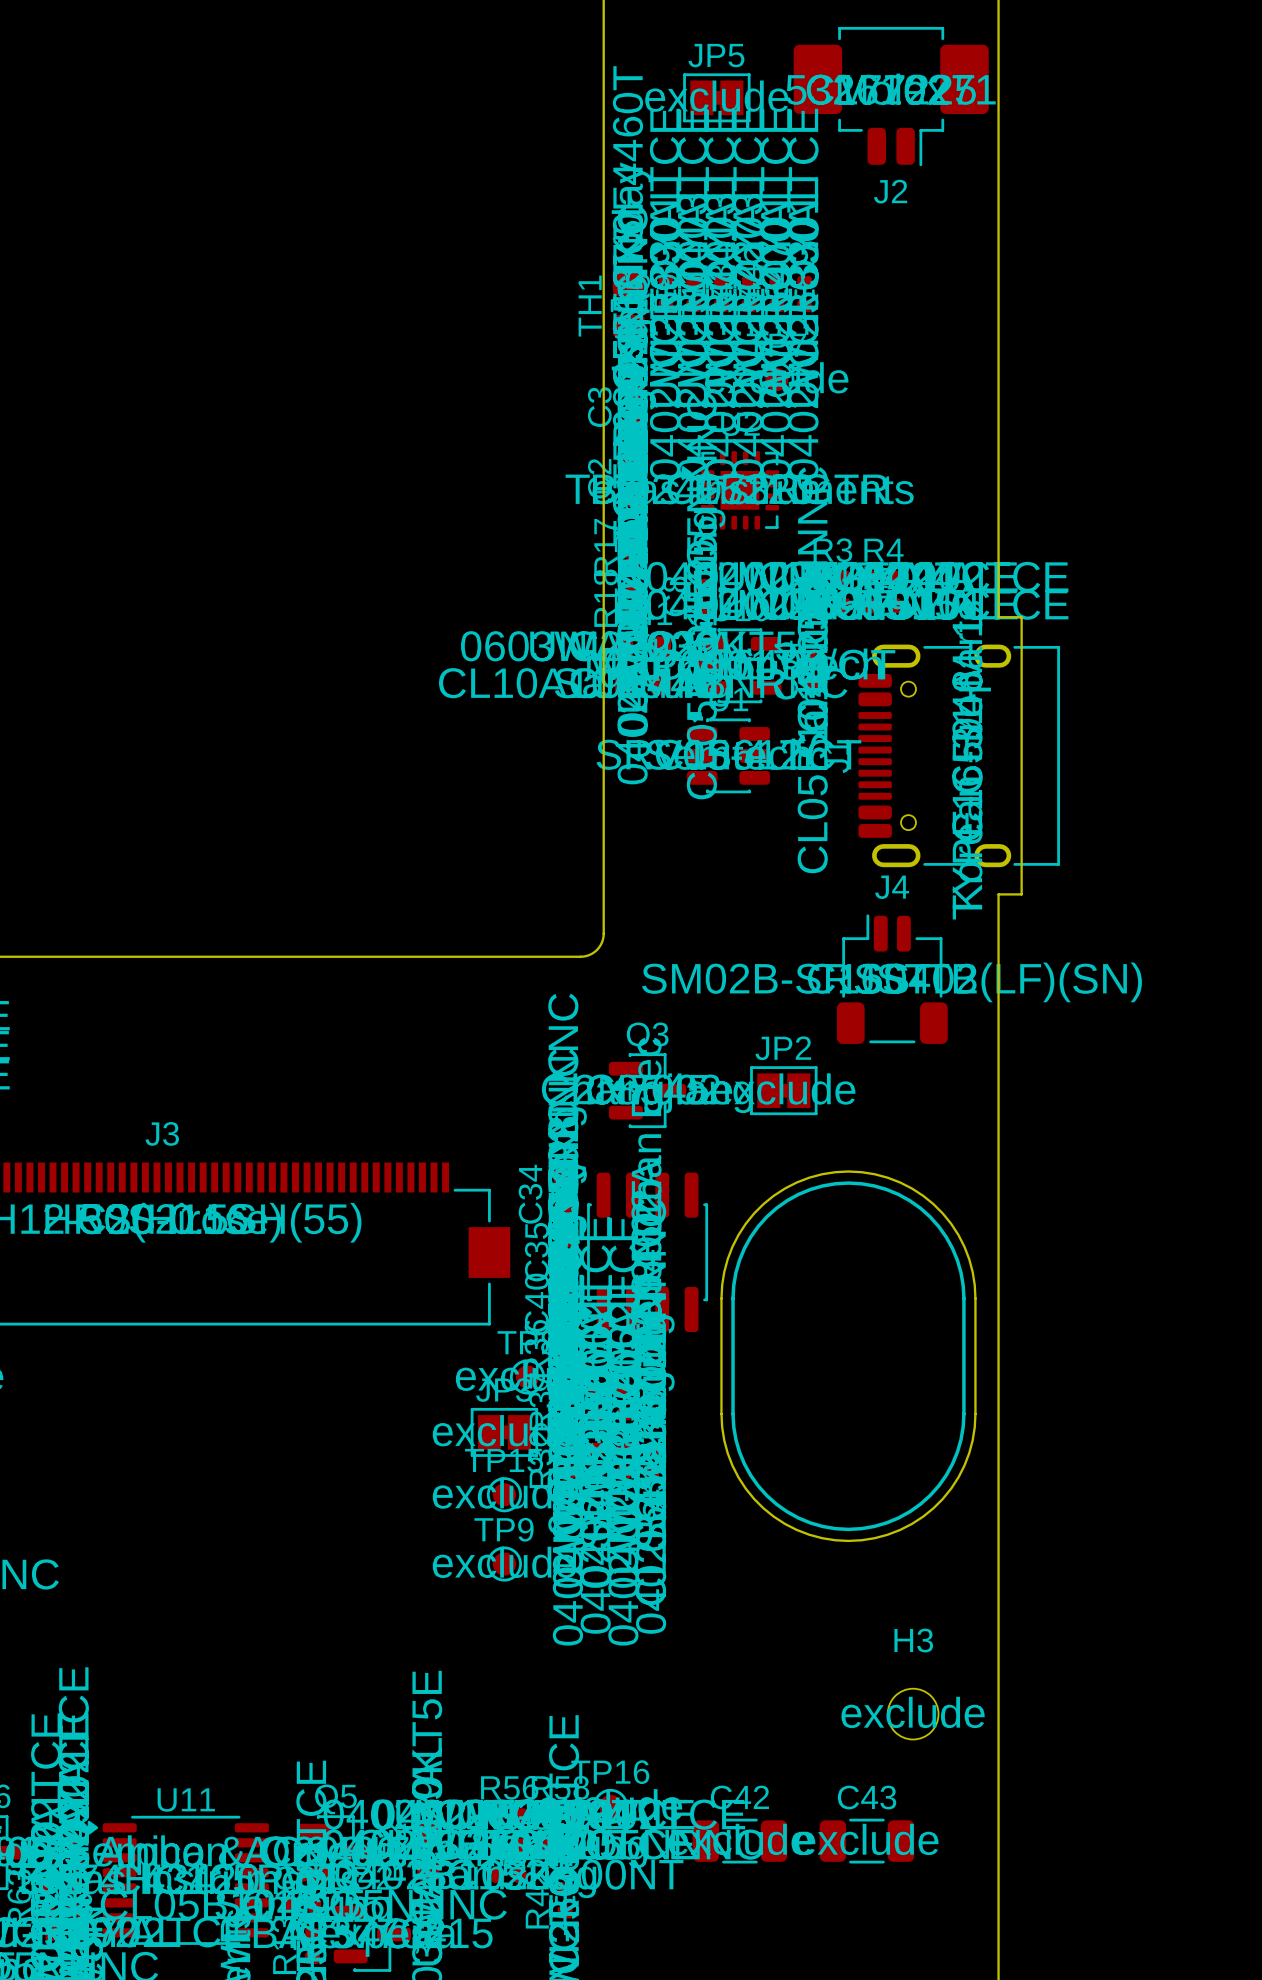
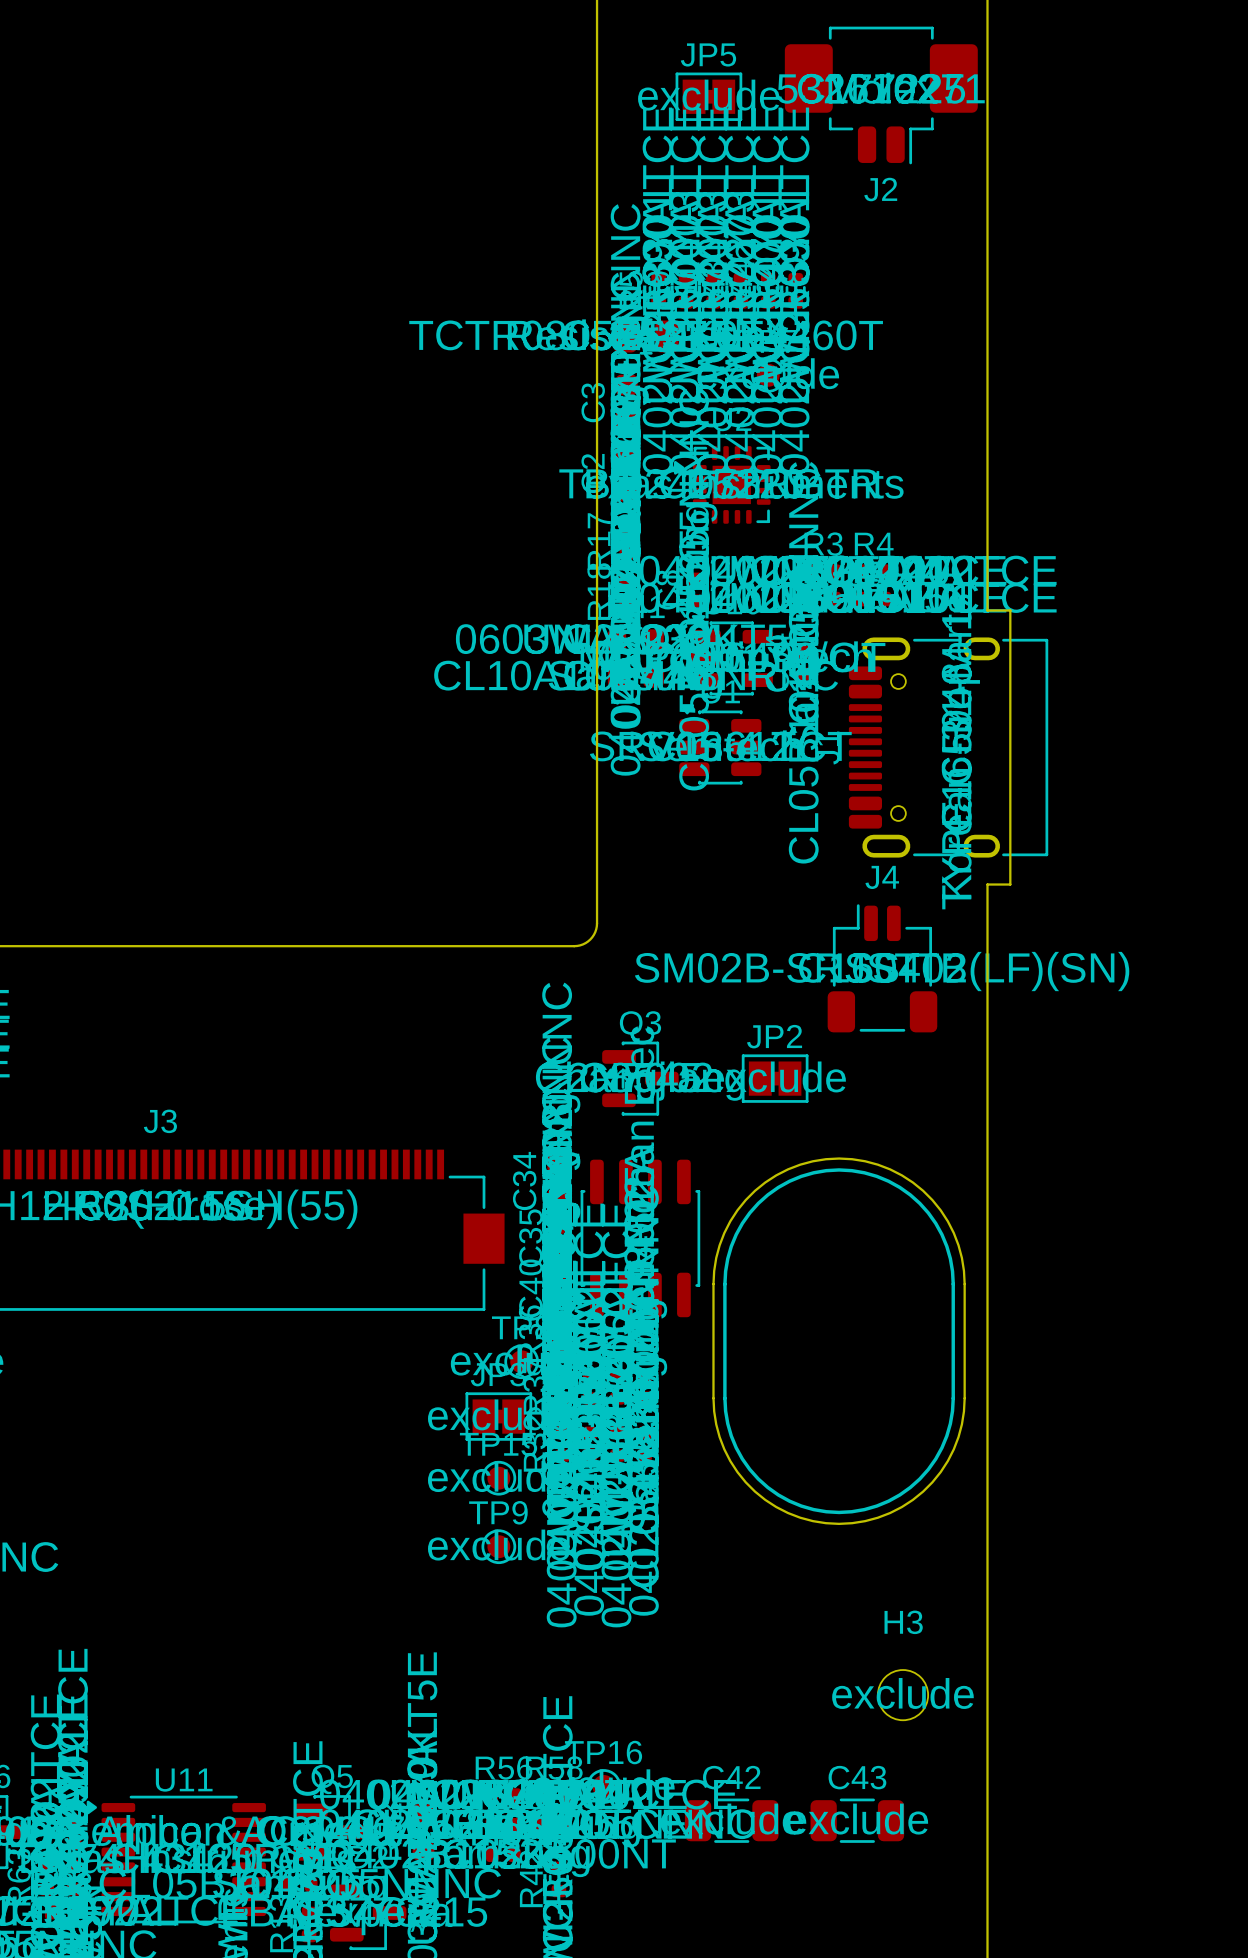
TH1 rotation: 0° (629, 305) -> 90° clockwise (646, 336)
TH1 position: (629, 305) -> (646, 336)

